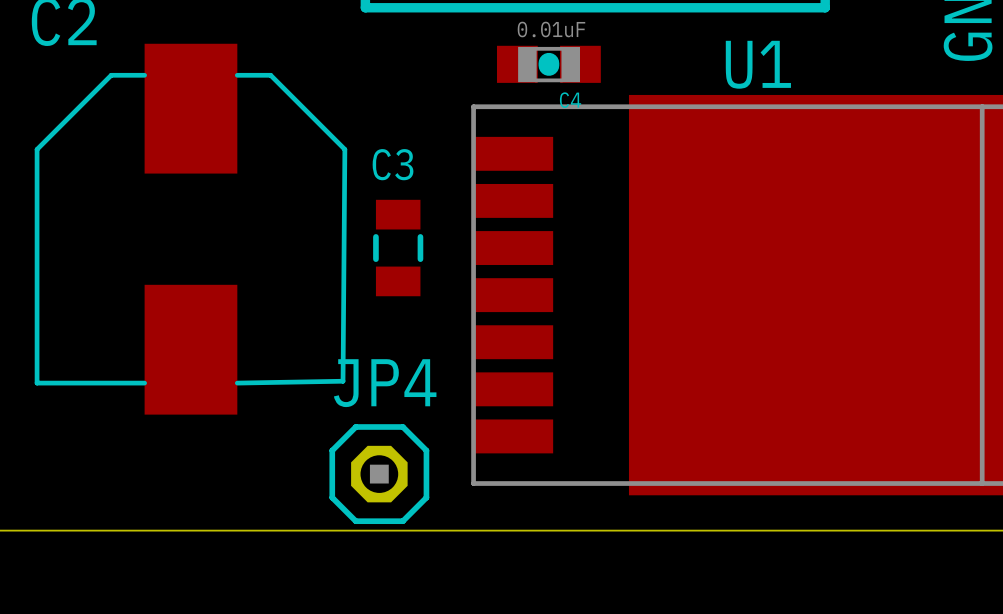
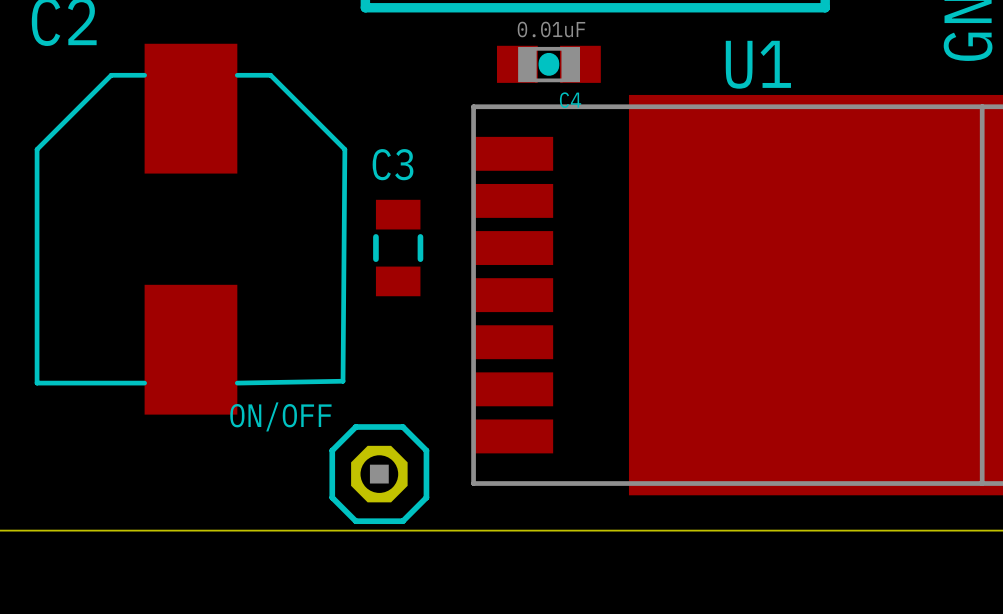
JP4 name: JP4 (385, 383) -> none
text: none -> ON/OFF (280, 416)

